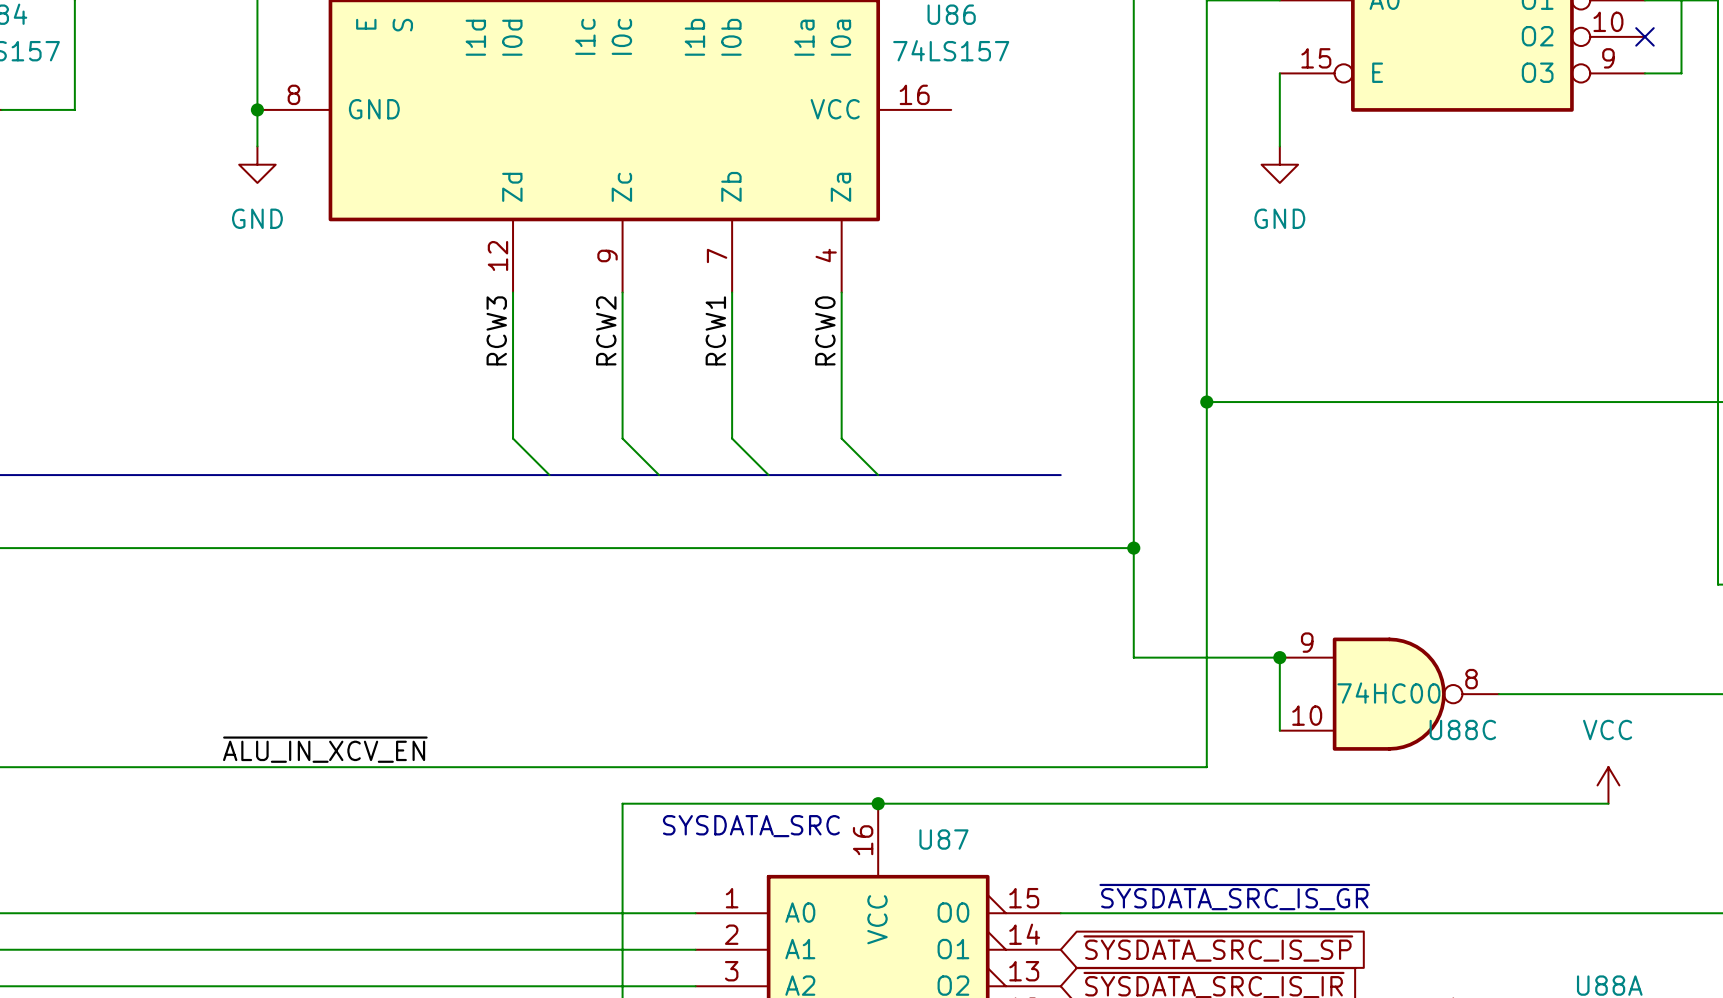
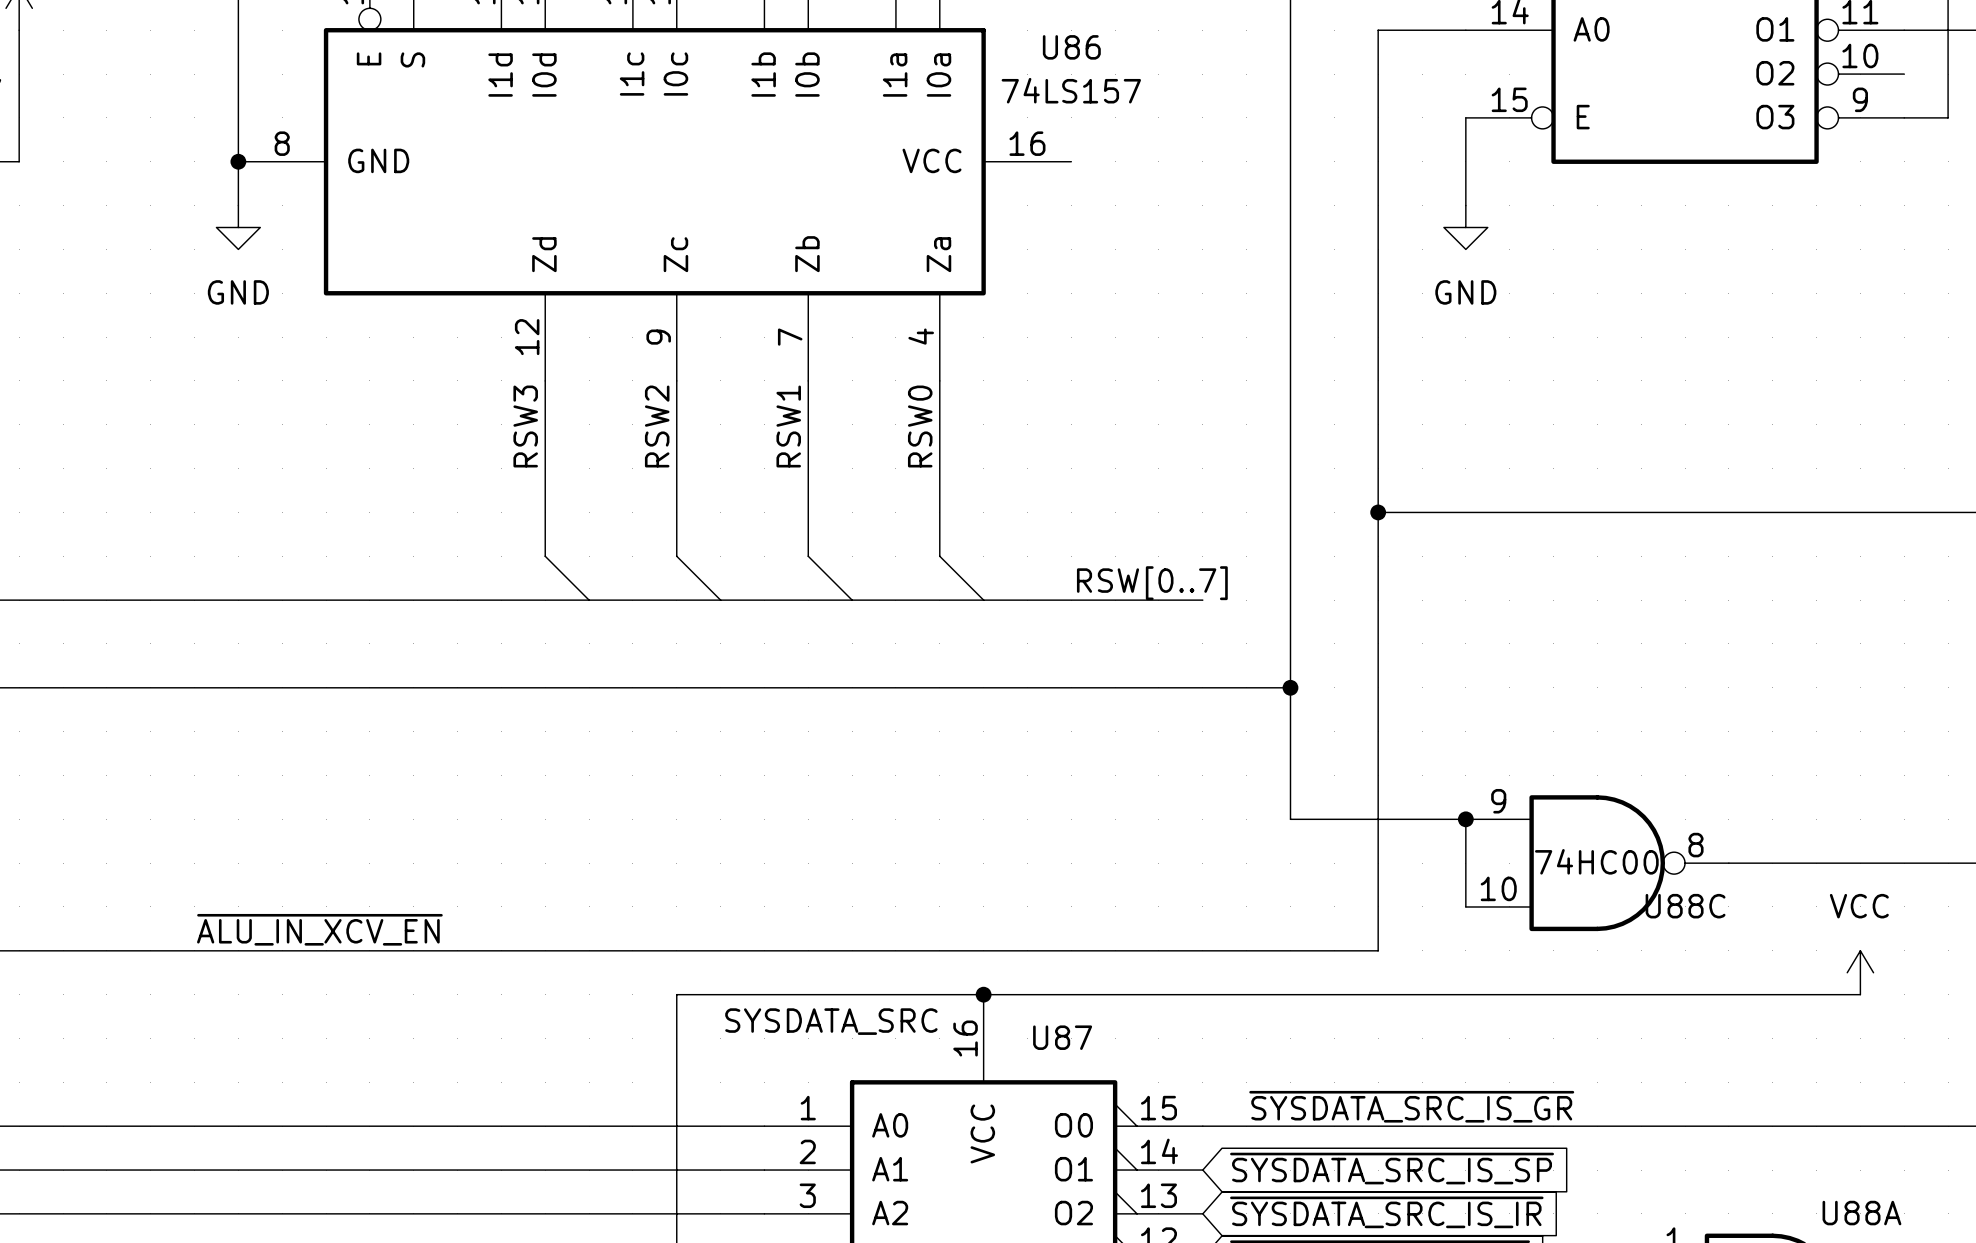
no-connect mark: (1644, 36) -> none
label: RCW3 (496, 330) -> RSW3 (525, 426)
label: RCW2 (606, 330) -> RSW2 (657, 426)
label: RCW1 (715, 330) -> RSW1 (788, 426)
label: RCW0 (825, 330) -> RSW0 (920, 426)
label: none -> RSW[0..7] (1152, 583)

